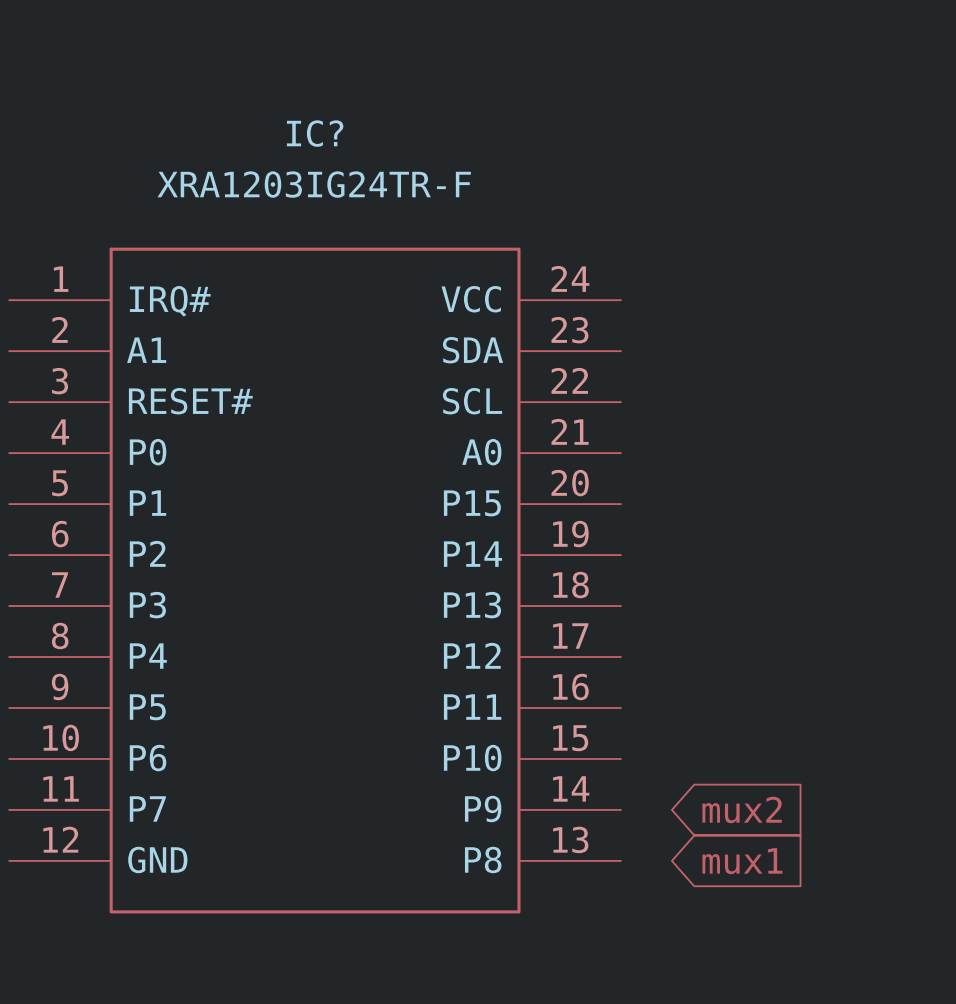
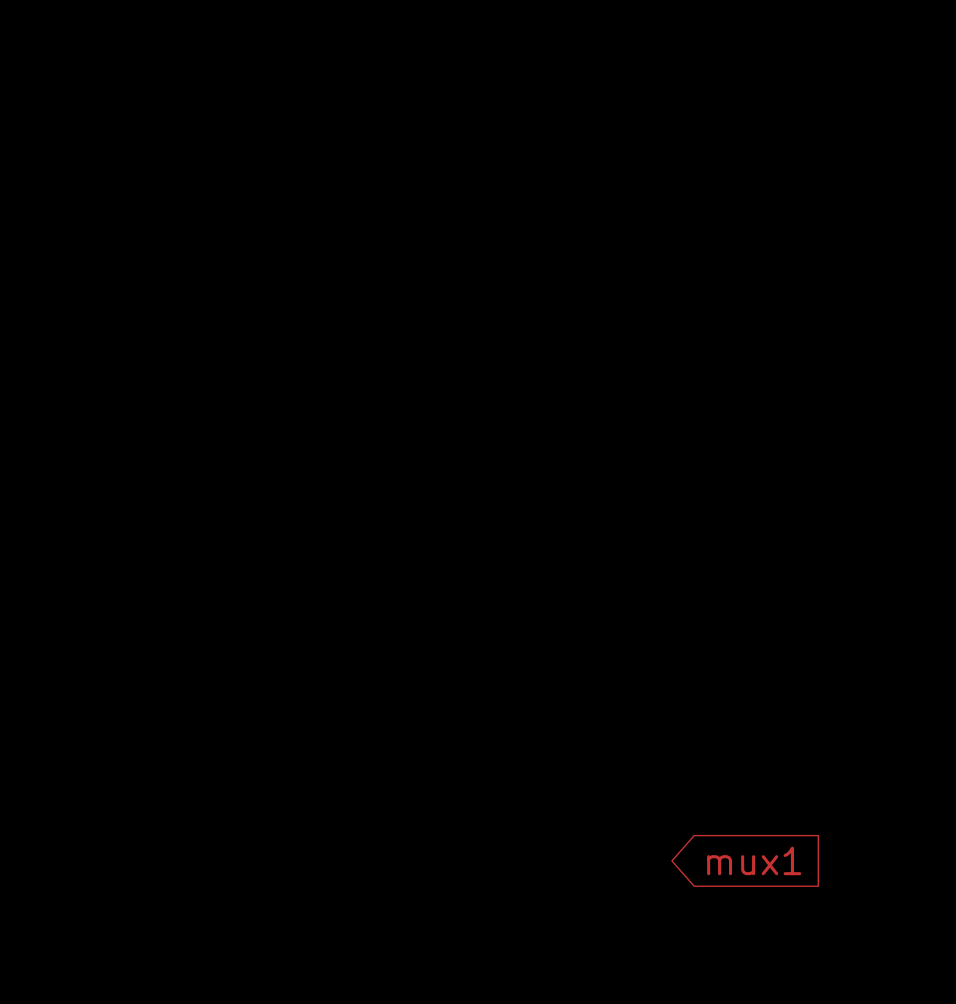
IC?: XRA1203IG24TR-F (315, 580) -> none
global label: mux2 (742, 809) -> none

